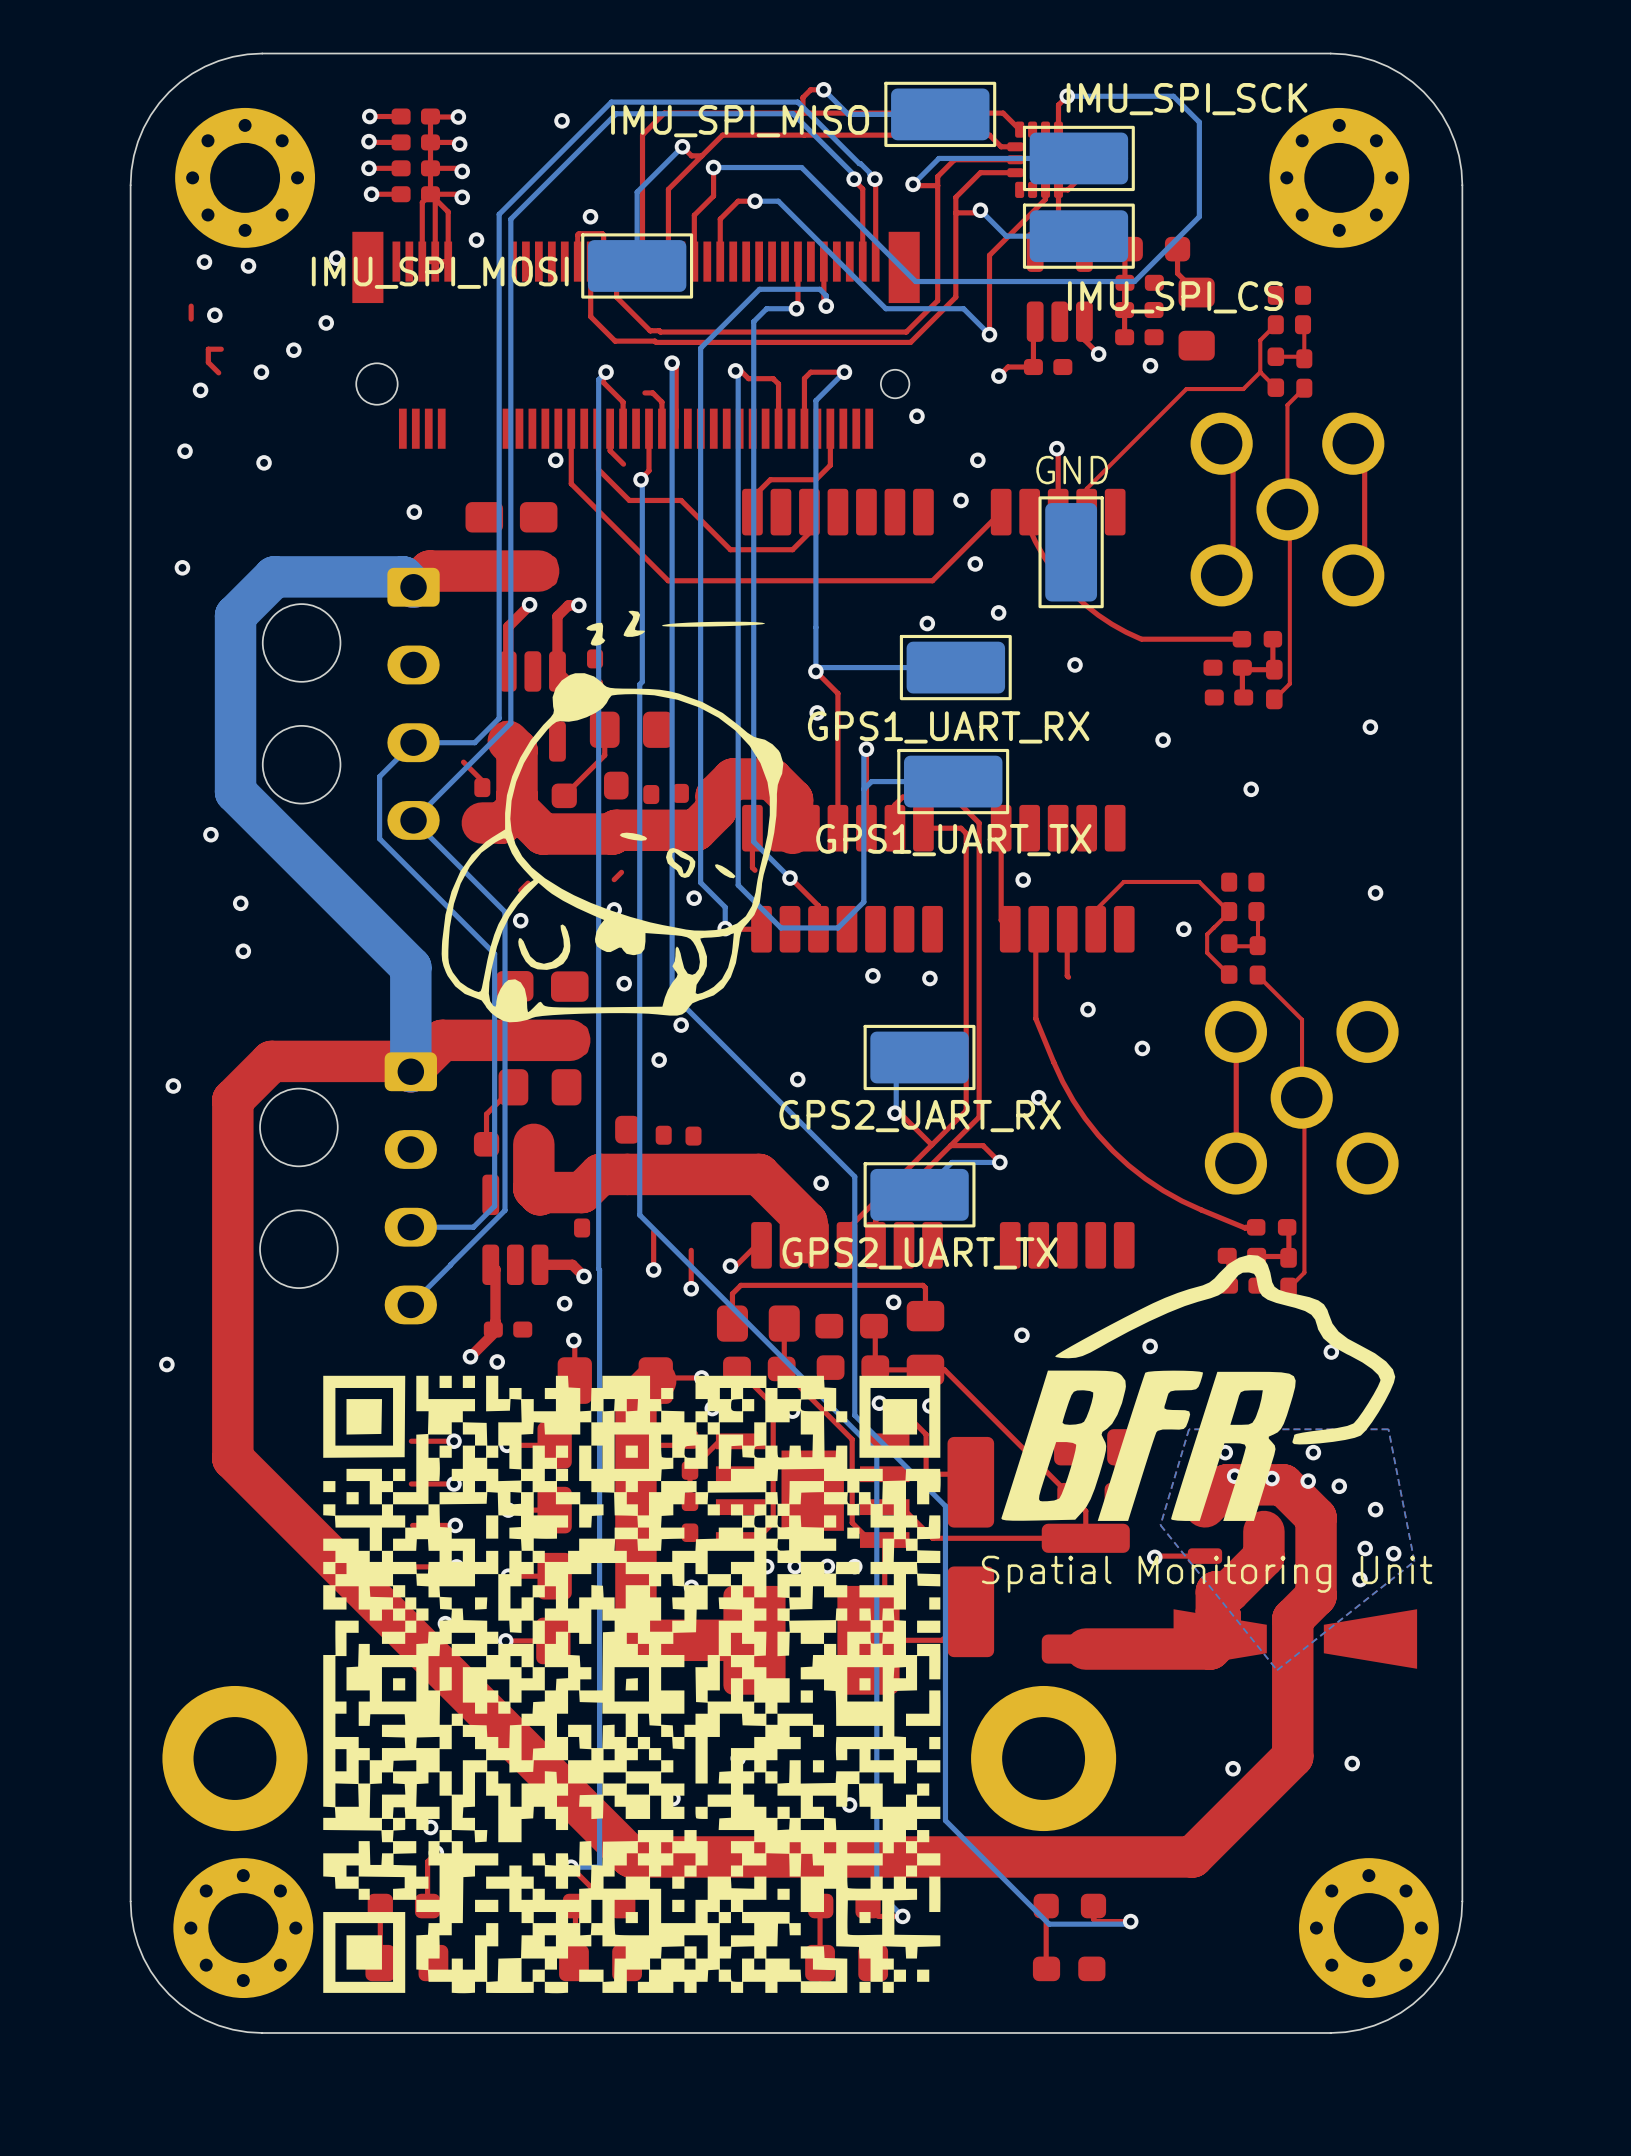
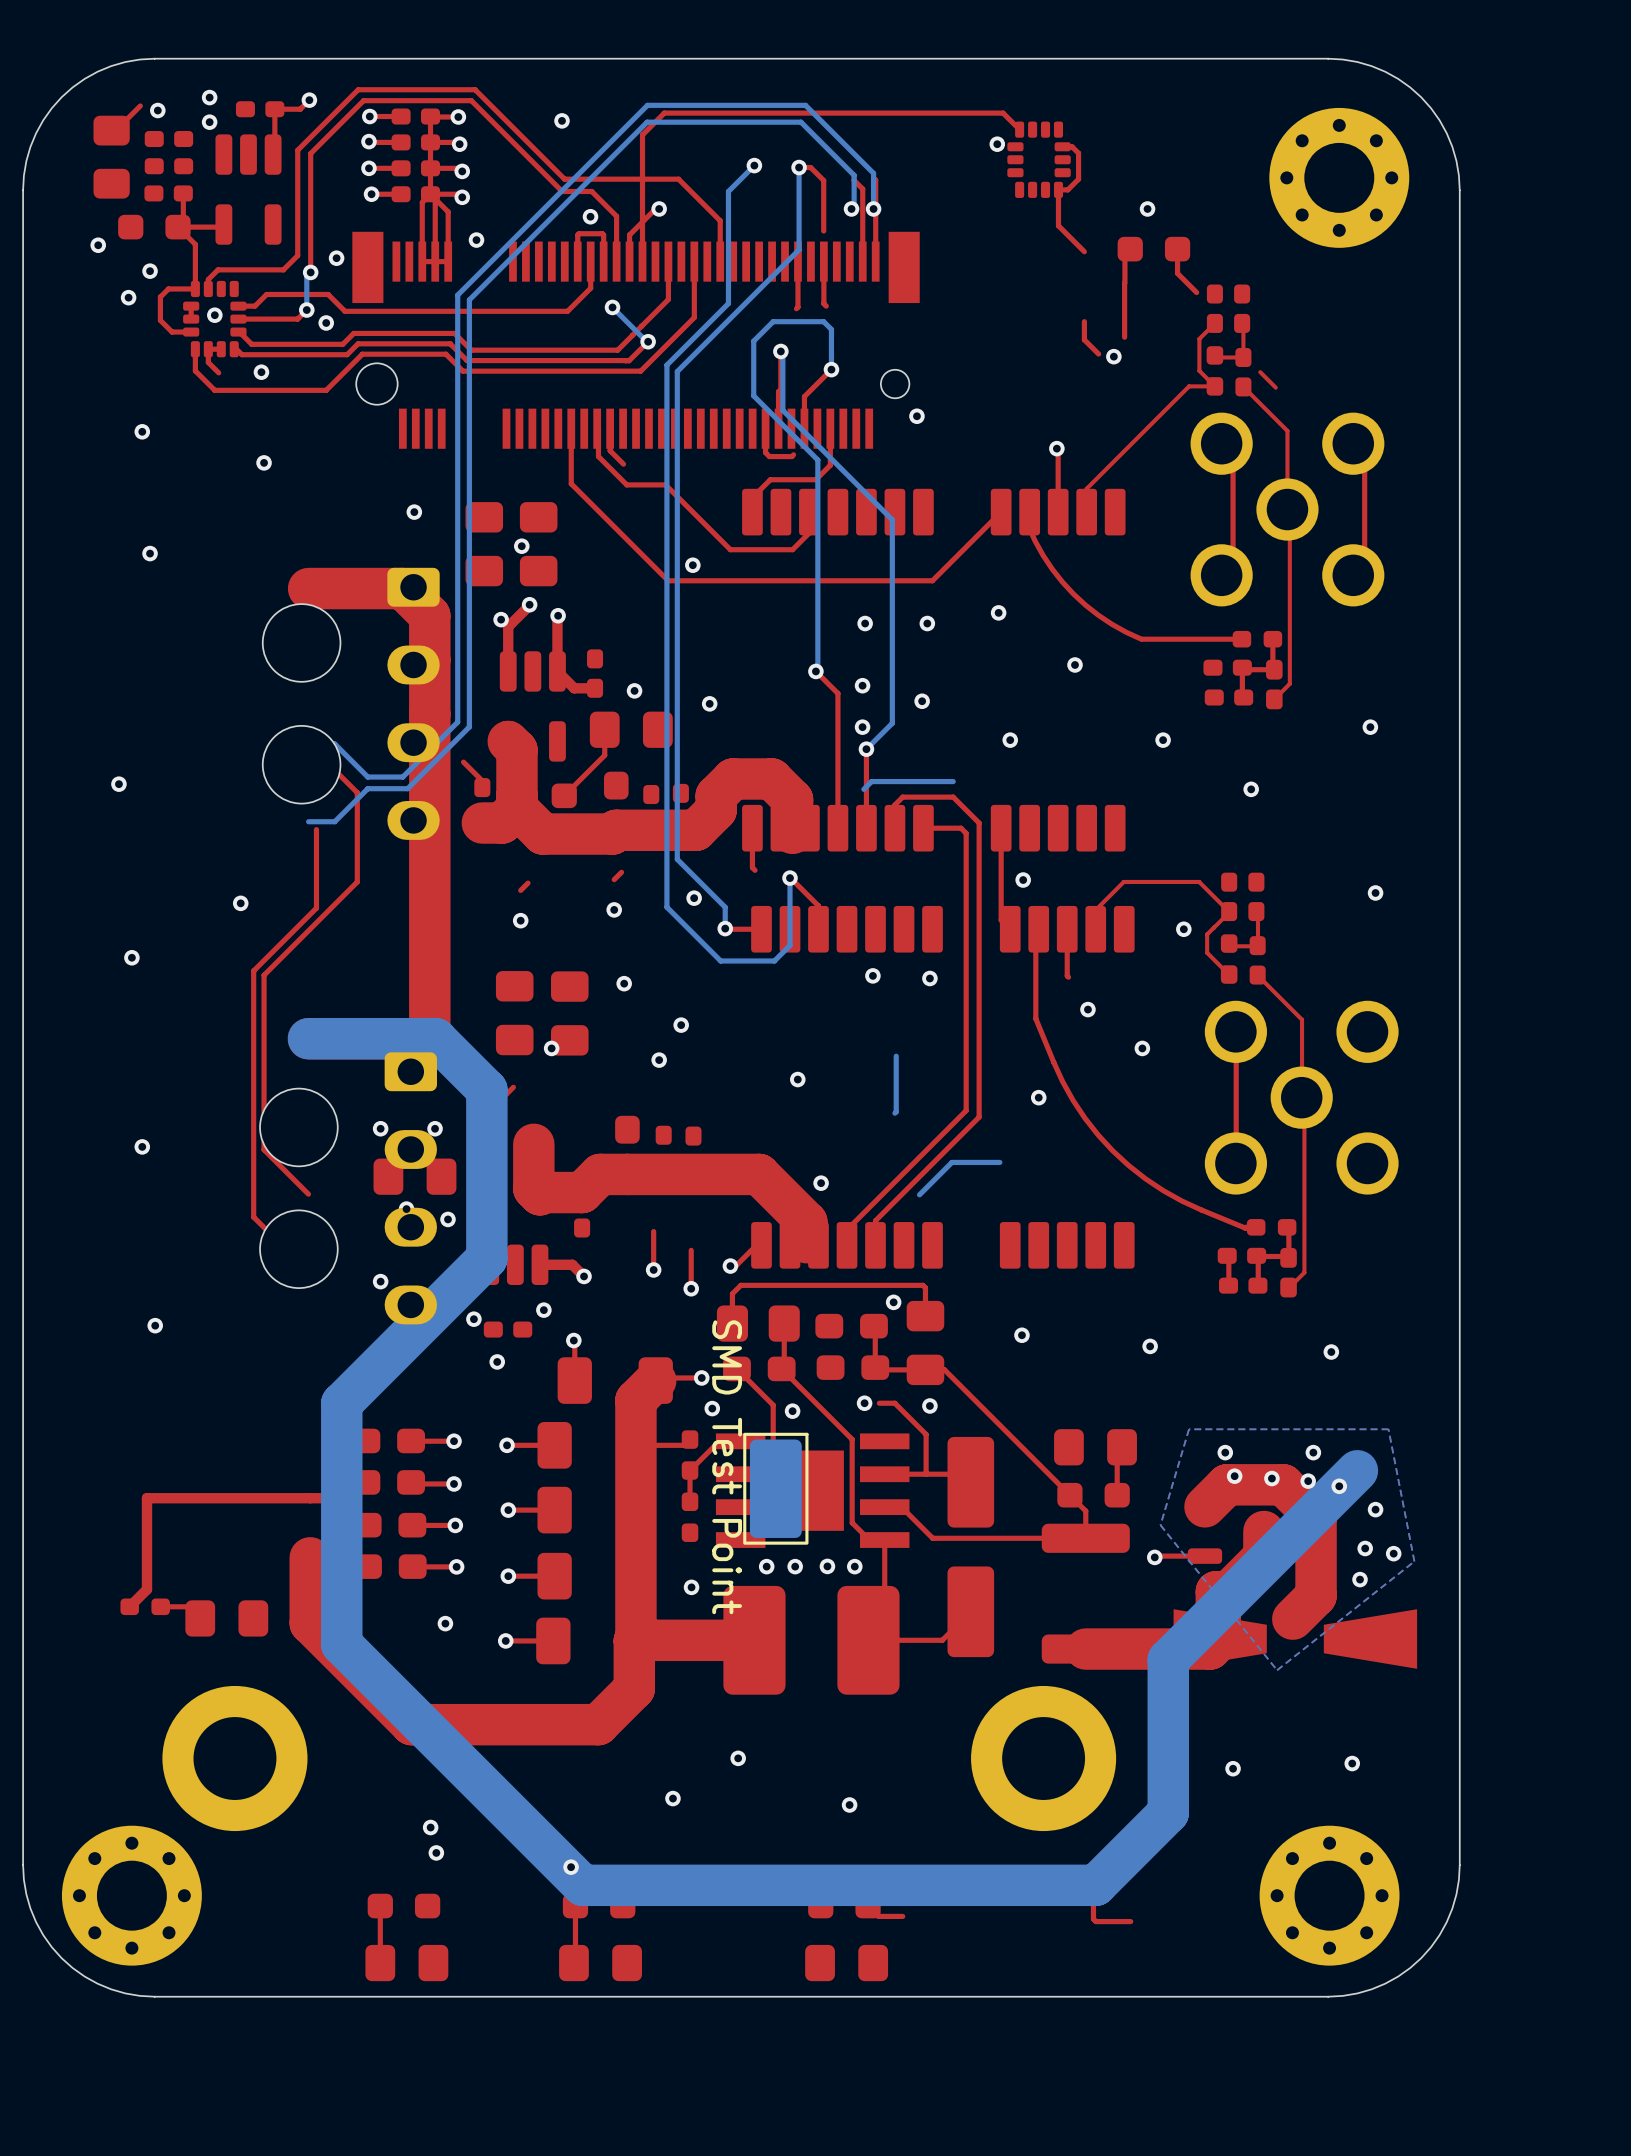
board edge: (1330, 53) (262, 53) (247, 54) (218, 60) (192, 73) (169, 92) (150, 115) (138, 141) (133, 155) (130, 185) (130, 1901) (133, 1930) (143, 1958) (150, 1971) (169, 1994) (192, 2012) (205, 2019) (232, 2029) (262, 2032) (1330, 2032) (1345, 2032) (1374, 2025) (1400, 2012) (1423, 1994) (1442, 1971) (1454, 1944) (1459, 1930) (1462, 1901) (1461, 170) (1454, 141) (1442, 115) (1433, 103) (1412, 82) (1400, 73) (1374, 60) (1345, 54) (1330, 53) -> (1328, 58) (1357, 62) (1385, 71) (1410, 87) (1421, 97) (1431, 108) (1446, 133) (1456, 161) (1458, 175) (1459, 1865) (1456, 1894) (1452, 1908) (1439, 1935) (1421, 1958) (1398, 1976) (1371, 1989) (1342, 1995) (1328, 1996) (154, 1996) (125, 1993) (97, 1983) (84, 1976) (61, 1958) (43, 1935) (36, 1922) (26, 1894) (23, 1865) (23, 190) (26, 161) (30, 146) (43, 120) (61, 97) (72, 87) (97, 71) (125, 62) (154, 58) (1328, 58)
top track: (823, 89) (810, 89) (802, 97) (802, 113) -> none
bottom track: (823, 89) (848, 114) (940, 114) -> none
via: (823, 89) -> none
top track: (1067, 96) (1058, 105) (1058, 129) -> none
bottom track: (1067, 96) (1173, 96) (1199, 122) (1199, 216) (1134, 281) (915, 281) (801, 167) (713, 167) -> none
via: (1067, 96) -> none
via: none -> (209, 97)
top track: none -> (309, 100) (300, 109) (274, 109) (274, 152)
via: none -> (309, 100)
top track: none -> (140, 105) (115, 130)
part footprint: [175, 107, 316, 248] -> [215, 134, 282, 245]
part: none -> (260, 109)
via: none -> (157, 110)
part: IMU_SPI_MISO (940, 114) -> none
via: none -> (209, 122)
part: none -> (168, 139)
via: none -> (997, 144)
top track: (682, 146) (691, 155) (701, 155) -> none
bottom track: (682, 146) (637, 192) (637, 265) -> none
via: (682, 146) -> none
top track: (1015, 146) (1001, 146) (989, 135) (722, 135) (668, 189) (668, 261) -> (239, 332) (251, 344) (342, 344) (353, 333) (454, 333) (471, 350) (617, 350) (668, 299) (668, 261)
part: none -> (111, 157)
part: IMU_SPI_SCK (1078, 158) -> none
bottom track: (1125, 158) (938, 158) (913, 184) -> none
top track: (1015, 159) (954, 159) (937, 176) (937, 300) (906, 332) (650, 330) (616, 297) (616, 261) -> (310, 272) (310, 153) (363, 100) (471, 100) (562, 191) (591, 191) (616, 216) (616, 261)
bottom track: none -> (754, 165) (728, 191) (728, 303) (666, 365) (666, 907) (720, 960) (774, 960) (790, 945) (790, 878)
via: none -> (754, 165)
part: none -> (168, 166)
top track: (713, 167) (713, 196) (694, 215) (694, 261) -> (195, 349) (195, 370) (214, 390) (326, 390) (362, 354) (445, 354) (462, 371) (640, 371) (694, 317) (694, 261)
via: (713, 167) -> none
top track: none -> (799, 167) (810, 167) (823, 180) (823, 231)
via: none -> (799, 167)
top track: (1015, 172) (980, 172) (955, 197) (955, 297) (910, 342) (615, 341) (590, 316) (590, 288) -> (238, 306) (254, 306) (266, 294) (328, 294) (344, 311) (567, 311) (590, 288)
bottom track: (854, 174) (792, 113) (616, 113) (510, 219) (510, 723) (413, 820) (505, 911) (505, 1210) (450, 1264) -> (854, 175) (801, 122) (647, 122) (469, 299) (469, 726) (407, 788) (367, 788) (334, 821) (308, 821)
bottom track: none -> (854, 179) (854, 206) (851, 208)
via: (854, 179) -> none
bottom track: (874, 179) (797, 102) (611, 102) (499, 214) (499, 718) (474, 742) (413, 742) (379, 776) (379, 838) (494, 953) (494, 1206) (473, 1227) (410, 1227) -> none
via: (874, 179) -> none
top track: (913, 184) (937, 185) -> none
via: (913, 184) -> none
top track: (1045, 189) (1045, 199) (989, 255) (989, 334) -> none
part: none -> (168, 193)
top track: none -> (183, 193) (183, 221)
top track: (755, 201) (738, 201) (720, 220) -> (208, 288) (208, 279) (218, 269) (283, 269) (297, 255) (297, 150) (358, 89) (475, 89) (564, 179) (678, 179) (720, 220)
bottom track: (755, 201) (778, 201) (885, 308) (963, 308) (989, 334) -> none
via: (755, 201) -> none
top track: none -> (659, 208) (655, 208) (629, 234) (629, 261)
via: none -> (659, 208)
via: none -> (851, 208)
bottom track: none -> (873, 208) (873, 173) (805, 105) (647, 105) (457, 295) (457, 722) (402, 777) (367, 777) (334, 744) (308, 744)
via: none -> (873, 208)
via: none -> (1147, 208)
top track: (980, 210) (977, 212) (955, 212) -> none
bottom track: (980, 210) (1006, 236) (1078, 236) -> none
via: (980, 210) -> none
part: none -> (154, 227)
top track: none -> (221, 227) (178, 227) (195, 244) (195, 288) (168, 288) (160, 297) (160, 320) (172, 332) (191, 332)
part: IMU_SPI_CS (1078, 236) -> none
via: none -> (98, 245)
via: (204, 262) -> none
via: (248, 265) -> none
part: IMU_SPI_MOSI (637, 265) -> none
via: none -> (150, 271)
bottom track: none -> (310, 272) (306, 276) (306, 310)
via: none -> (310, 272)
part footprint: [1178, 277, 1215, 361] -> [1206, 284, 1223, 333]
part: (1139, 282) -> none
part: (1059, 286) -> none
bottom track: (759, 289) (819, 289) (826, 295) (826, 306) -> (759, 289) (799, 249) (799, 167)
via: none -> (128, 297)
via: (826, 306) -> none
bottom track: none -> (612, 307) (648, 341)
via: none -> (612, 307)
bottom track: (796, 308) (766, 308) (753, 321) (753, 341) -> (831, 369) (831, 329) (823, 321) (773, 321) (753, 341)
via: (796, 308) -> none
part: none -> (1242, 308)
top track: none -> (306, 310) (297, 319) (238, 319)
via: none -> (306, 310)
part: (1139, 310) -> none
part: (1275, 310) -> none
part: (1303, 310) -> none
part: none -> (214, 319)
top track: (1033, 323) (1033, 367) (1007, 367) (998, 376) -> none
top track: none -> (1243, 324) (1243, 357) (1216, 357)
top track: (1275, 324) (1260, 340) (1260, 372) (1243, 389) (1186, 389) -> (1214, 323) (1199, 338) (1199, 370) (1214, 386) (1189, 386) (1186, 389)
top track: (1304, 326) (1304, 358) -> none
via: (989, 334) -> none
part: (1139, 337) -> none
top track: none -> (648, 341) (629, 360) (625, 360)
via: none -> (648, 341)
bottom track: (700, 348) (700, 882) -> (700, 348) (677, 371) (677, 859) (700, 882)
top track: none -> (234, 349) (242, 354) (347, 354) (358, 343) (450, 343) (467, 360) (625, 360)
via: (293, 350) -> none
via: none -> (780, 351)
via position: (1098, 354) -> (1113, 356)
top track: (1302, 356) (1275, 356) -> none
top track: (672, 363) (676, 367) (676, 427) -> none
bottom track: (672, 363) (672, 994) (854, 1176) (854, 1415) (945, 1506) (945, 1820) (1049, 1924) (1128, 1924) (1130, 1921) -> none
via: (672, 363) -> none
via: (1150, 365) -> none
part: (1048, 367) -> none
top track: (735, 370) (740, 370) (748, 378) (773, 378) (778, 384) (778, 391) -> (780, 351) (780, 389) (778, 391)
bottom track: (735, 370) (738, 373) (738, 885) (780, 927) (837, 927) (863, 902) (863, 751) (866, 749) -> (780, 351) (782, 353) (782, 410) (892, 519) (892, 723) (866, 749)
via: (735, 370) -> none
top track: (606, 372) (603, 374) (603, 382) (623, 402) (623, 428) -> none
bottom track: (606, 372) (598, 379) (599, 1865) (571, 1867) -> none
via: (606, 372) -> none
top track: (844, 372) (810, 372) (804, 378) (804, 396) -> (831, 369) (804, 396)
bottom track: (844, 372) (815, 400) (815, 671) -> none
via position: (844, 372) -> (831, 369)
part: none -> (1243, 372)
part position: (1275, 372) -> (1214, 370)
part: (1304, 373) -> none
via: (998, 376) -> none
top track: (1304, 388) (1287, 405) (1287, 430) -> (1243, 386) (1287, 430)
via: (200, 390) -> none
top track: (644, 392) (652, 392) (661, 402) (661, 428) -> none
bottom track: (753, 395) (753, 841) (790, 878) -> (753, 395) (817, 460) (817, 669)
top track: (648, 428) (648, 470) (641, 479) -> none
top track: none -> (765, 428) (765, 452) (769, 456) (791, 456) (793, 454)
via: none -> (142, 431)
via: (185, 451) -> none
top track: (598, 456) (598, 469) (629, 500) (681, 500) -> (598, 456) (626, 484) (665, 484) (681, 500)
via: (555, 460) -> none
via: (977, 460) -> none
text: GND (1072, 470) -> none
bottom track: (641, 479) (642, 681) (639, 684) (639, 1215) (876, 1452) (876, 1890) (902, 1916) -> none
via: (641, 479) -> none
via: (961, 500) -> none
via: none -> (521, 546)
part: (1071, 552) -> none
via: (975, 563) -> none
via: none -> (692, 565)
via position: (182, 567) -> (150, 553)
top track: (538, 571) (429, 571) (413, 587) -> none
bottom track: (413, 587) (403, 576) (274, 576) (235, 615) (235, 792) (410, 967) (410, 1071) -> none
top track: none -> (308, 588) (402, 588) (429, 615) (429, 1039)
top track: (578, 605) (568, 605) (558, 615) -> none
via position: (578, 605) -> (558, 615)
drawing: [441, 610, 784, 1023] -> none
via: none -> (501, 619)
via: none -> (865, 623)
bottom track: (955, 667) (819, 667) (817, 669) -> none
part: (955, 667) -> none
via: none -> (862, 685)
via: none -> (634, 690)
via: none -> (922, 701)
via: none -> (709, 703)
via: (817, 712) -> none
via: none -> (862, 727)
text: GPS1_UART_RX (948, 727) -> none
via: none -> (1010, 740)
top track: none -> (308, 744) (357, 792) (357, 881) (264, 975) (264, 1149) (308, 1194)
part: GPS1_UART_TX (953, 781) -> none
via: none -> (118, 784)
top track: none -> (316, 829) (316, 908) (253, 970) (253, 1217) (308, 1271)
via: (210, 834) -> none
via: (243, 951) -> none
via: none -> (131, 957)
bottom track: none -> (308, 1038) (435, 1038) (486, 1089) (486, 1258) (341, 1403) (341, 1644) (582, 1885) (1095, 1885) (1168, 1812) (1168, 1659) (1357, 1470)
top track: (569, 1040) (442, 1040) (410, 1071) (400, 1061) (271, 1061) (232, 1100) (232, 1458) (631, 1856) (1192, 1856) (1292, 1756) (1292, 1619) -> none
via: none -> (551, 1048)
part: GPS2_UART_RX (919, 1057) -> none
via: (173, 1086) -> none
part position: (539, 1087) -> (414, 1176)
top track: (894, 1113) (900, 1113) (931, 1144) -> none
via: (894, 1113) -> none
via: none -> (380, 1128)
via: none -> (435, 1128)
top track: (950, 1145) (983, 1145) (999, 1162) -> none
via: none -> (142, 1146)
via: (999, 1162) -> none
part: GPS2_UART_TX (919, 1194) -> none
via: none -> (406, 1209)
via: none -> (448, 1219)
drawing: [1001, 1254, 1396, 1521] -> none
top track: (490, 1264) (495, 1269) (495, 1326) -> none
bottom track: (450, 1265) (410, 1304) -> none
via: none -> (380, 1281)
via position: (564, 1303) -> (543, 1310)
top track: (493, 1333) (470, 1356) -> none
via position: (470, 1356) -> (473, 1319)
via position: (166, 1364) -> (155, 1325)
drawing: [323, 1375, 941, 1994] -> none
via position: (879, 1403) -> (864, 1403)
part: none -> (388, 1440)
top track: none -> (361, 1482) (345, 1498) (147, 1498) (147, 1589) (129, 1606)
part: none -> (388, 1482)
part: none -> SMD Test Point (775, 1488)
part: none -> (390, 1525)
top track: none -> (363, 1566) (354, 1557) (310, 1557) (310, 1623) (411, 1724) (598, 1724) (634, 1688) (634, 1640)
part: none -> (390, 1566)
text: Spatial Monitoring Unit (1207, 1574) -> none
part: none -> (145, 1606)
top track: none -> (188, 1606) (160, 1606)
part: none -> (226, 1618)
top track: (436, 1852) (427, 1861) (427, 1906) -> none
top track: (1046, 1906) (1046, 1975) -> none
part: (1069, 1906) -> none
top track: (820, 1915) (820, 1979) -> none
via: (902, 1916) -> none
via: (1130, 1921) -> none
part position: (243, 1928) -> (131, 1895)
part position: (1368, 1928) -> (1329, 1895)
part: (1069, 1968) -> none

